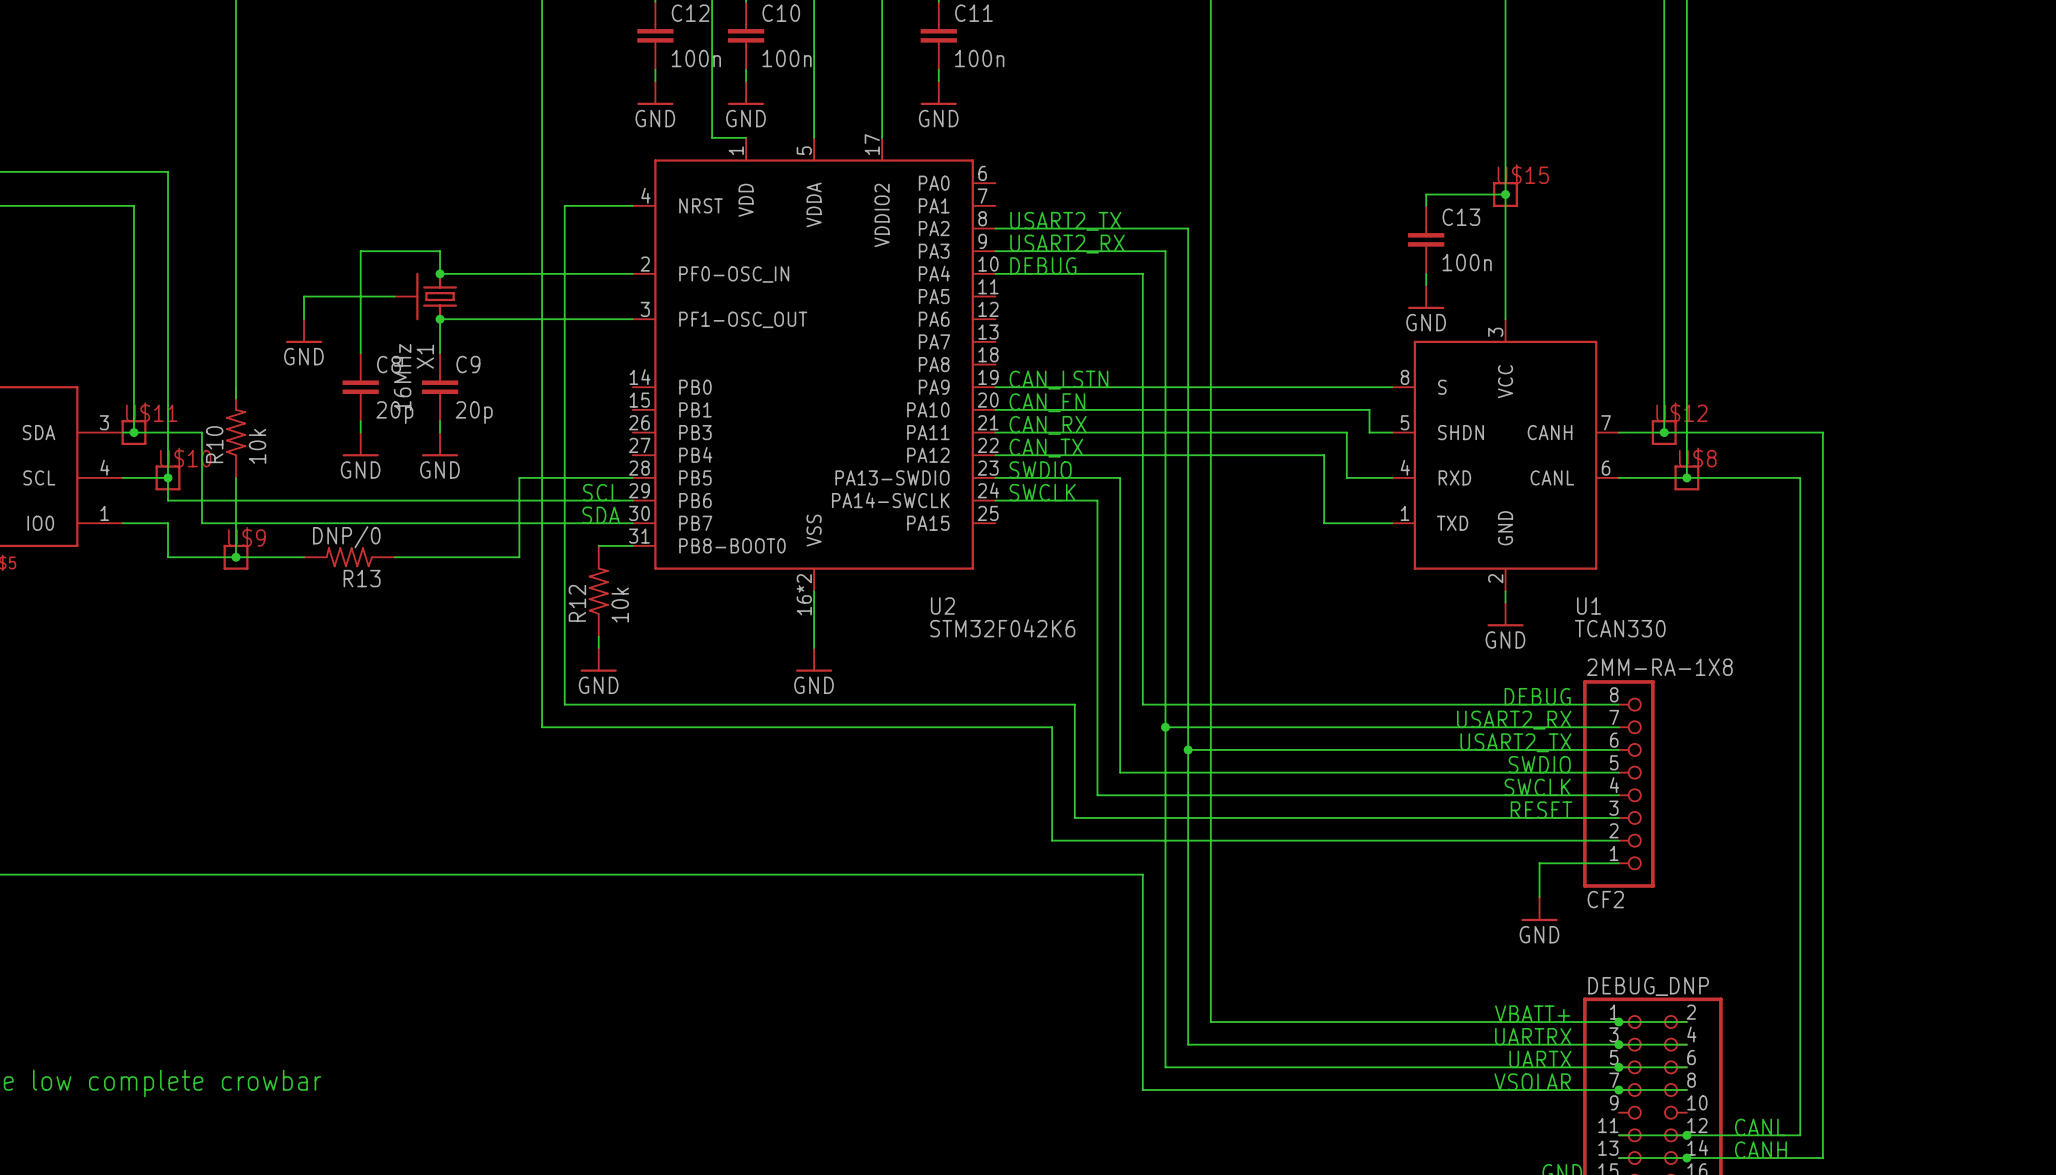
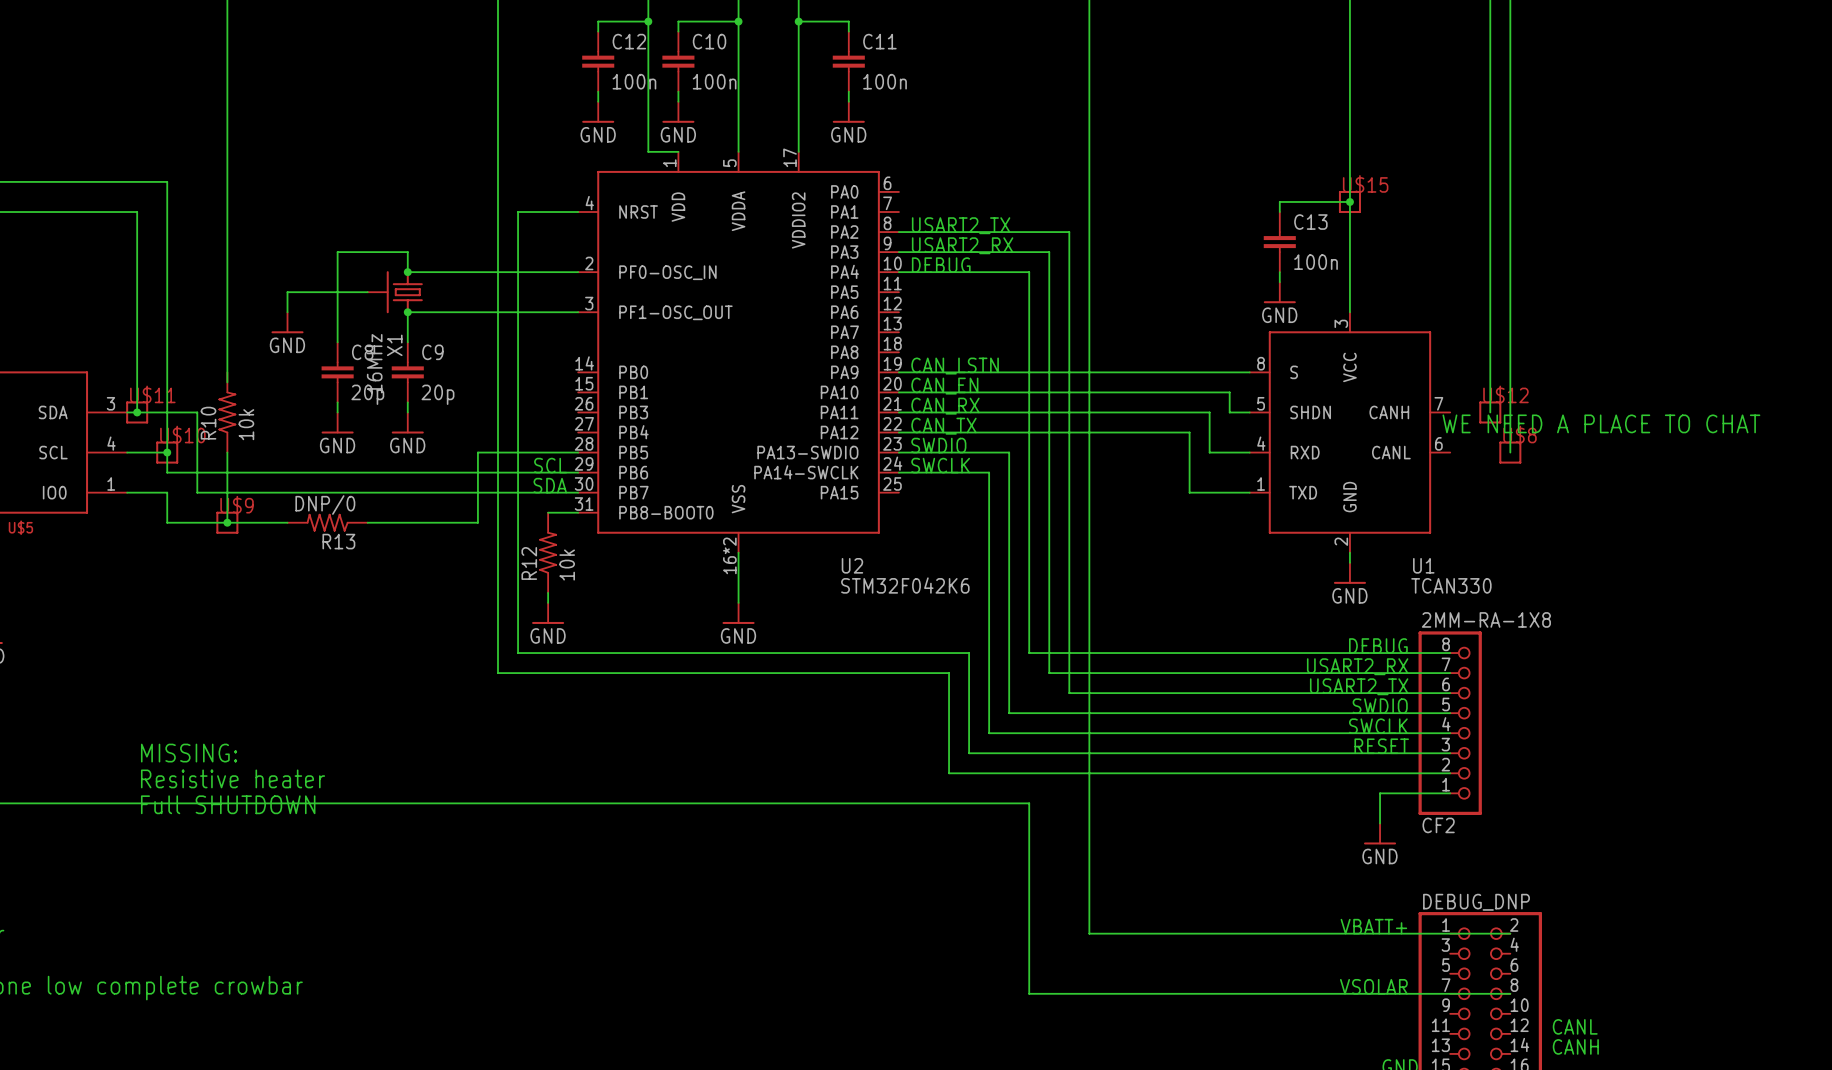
wire: (1618, 432) (1822, 432) (1822, 1158) (1618, 1158) -> none
junction: (1664, 432) -> none
text: none -> WE NEED A PLACE TO CHAT (1601, 423)
wire: (1618, 477) (1800, 477) (1800, 1135) (1618, 1135) -> none
junction: (1686, 477) -> none
wire: (1165, 727) (1165, 1067) (1686, 1067) -> none
junction: (1165, 727) -> none
wire: (1188, 749) (1188, 1044) (1686, 1044) -> none
junction: (1188, 749) -> none
text: none -> MISSING: (189, 753)
text: none -> Resistive heater (233, 778)
text: none -> Full SHUTDOWN (228, 804)
junction: (1618, 1021) -> none
text: UARTRX (1533, 1036) -> none
junction: (1618, 1044) -> none
text: UARTX (1540, 1059) -> none
junction: (1618, 1067) -> none
junction: (1618, 1090) -> none
junction: (1686, 1135) -> none
junction: (1686, 1158) -> none

